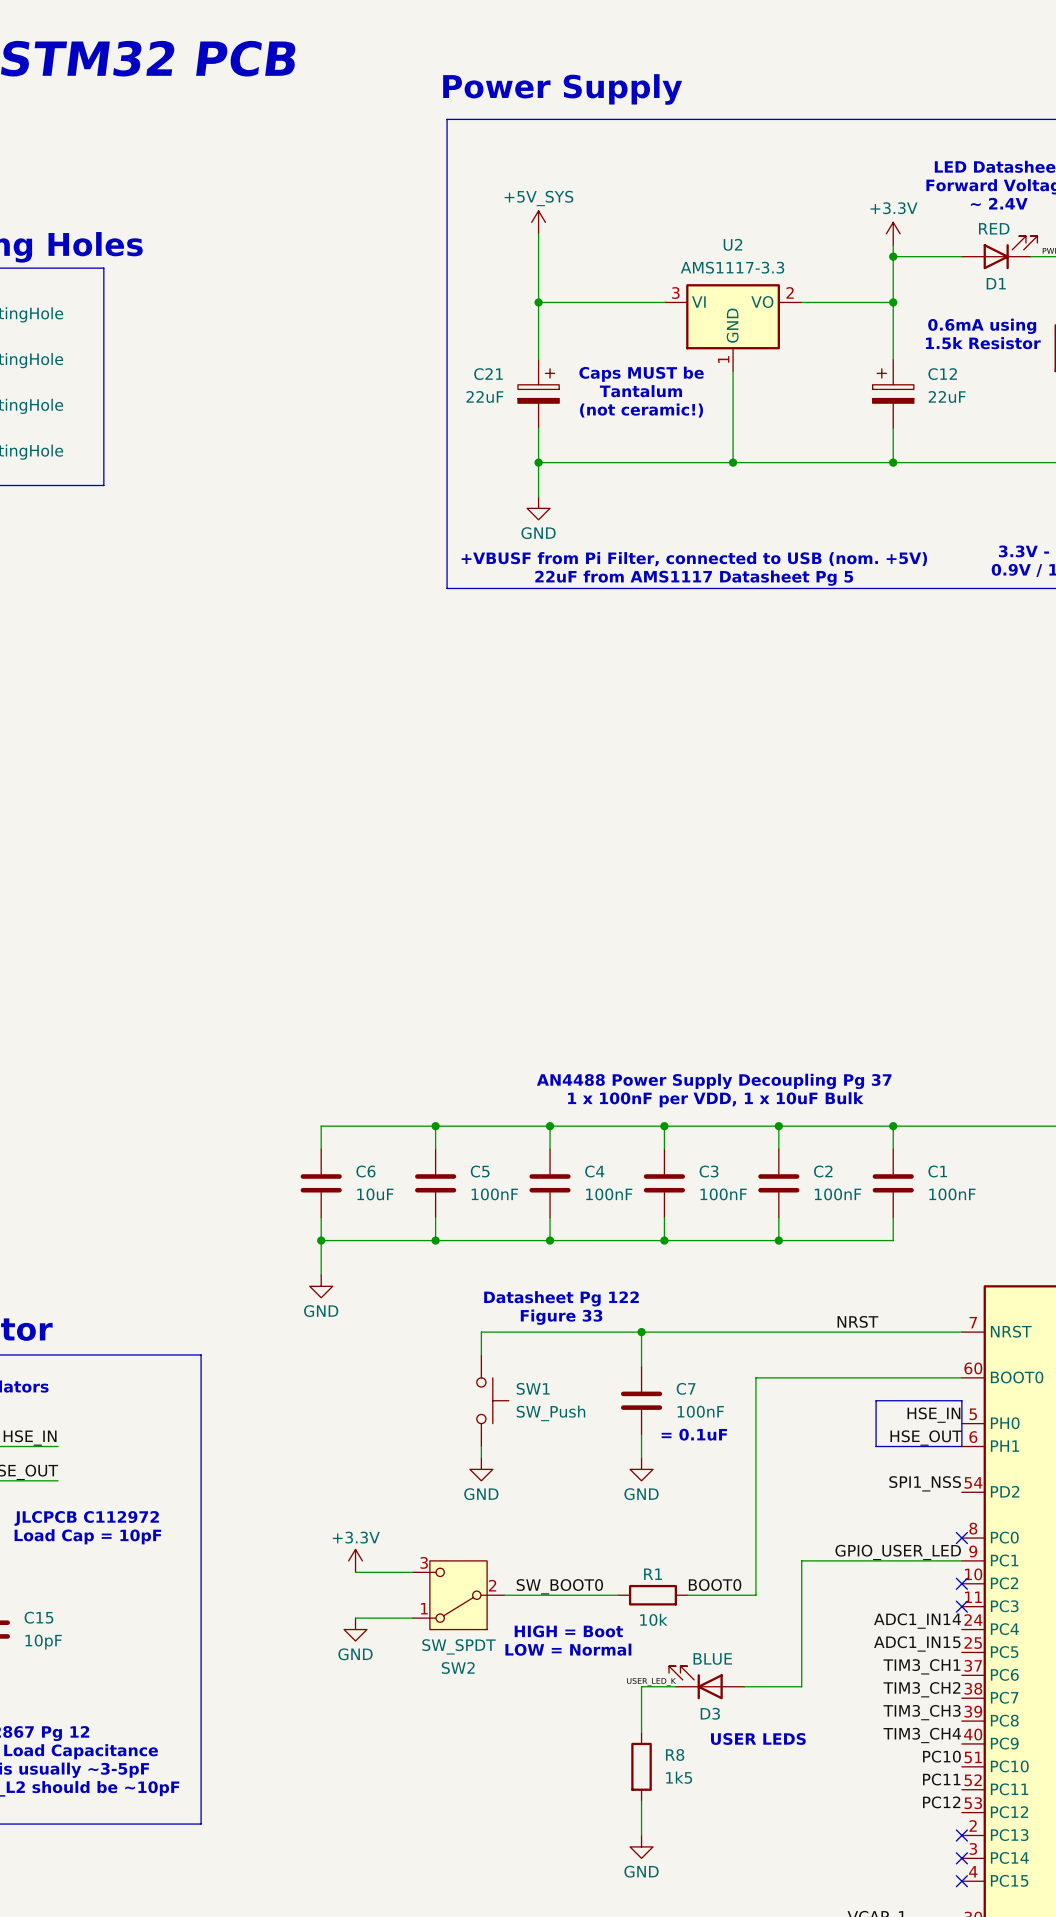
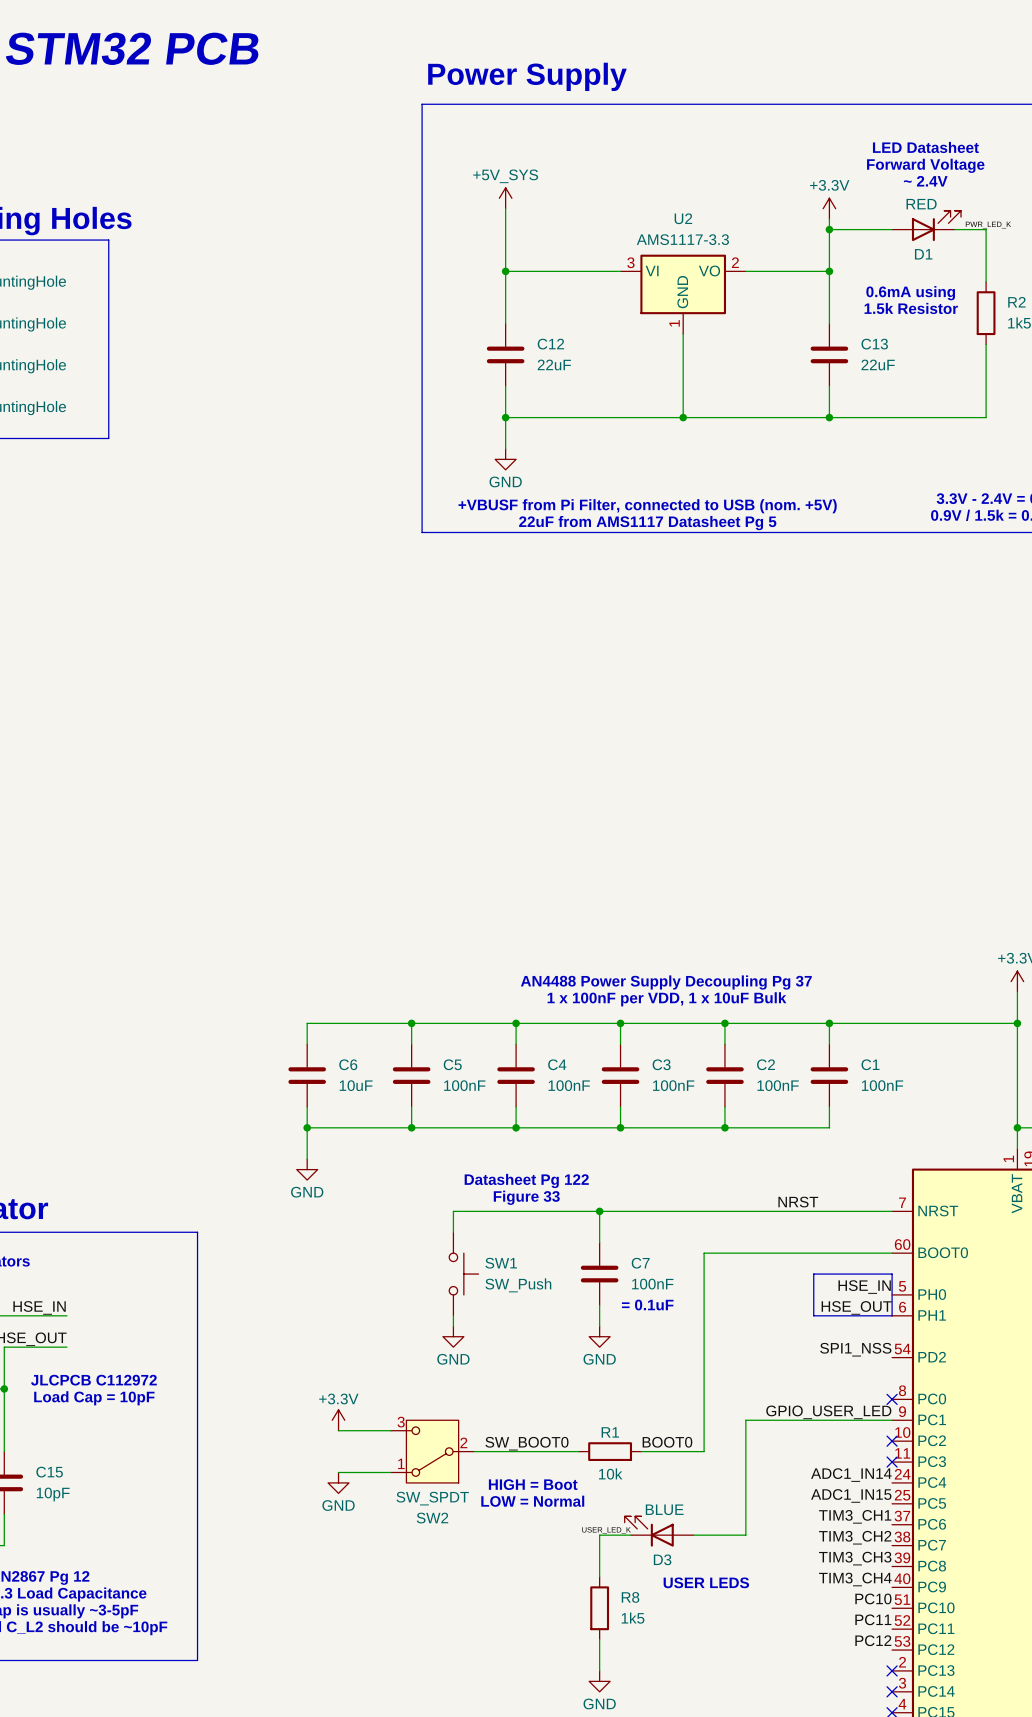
C12 symbol: [872, 359, 914, 429] -> [486, 323, 525, 387]
text: Caps MUST be (641, 374) -> none
text: Tantalum (640, 391) -> none
C21: 22uF (538, 393) -> none
C13: none -> 22uF (829, 354)
text: (not ceramic!) (641, 410) -> none

